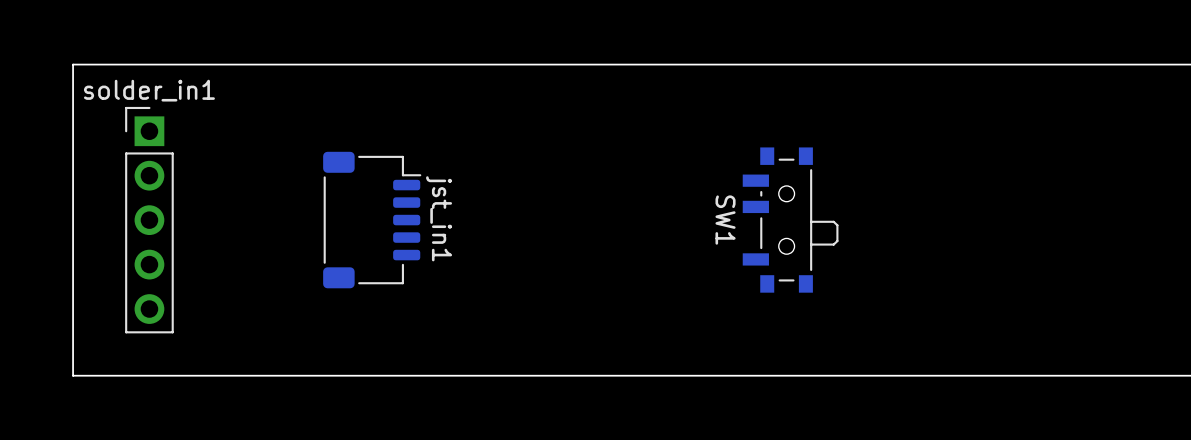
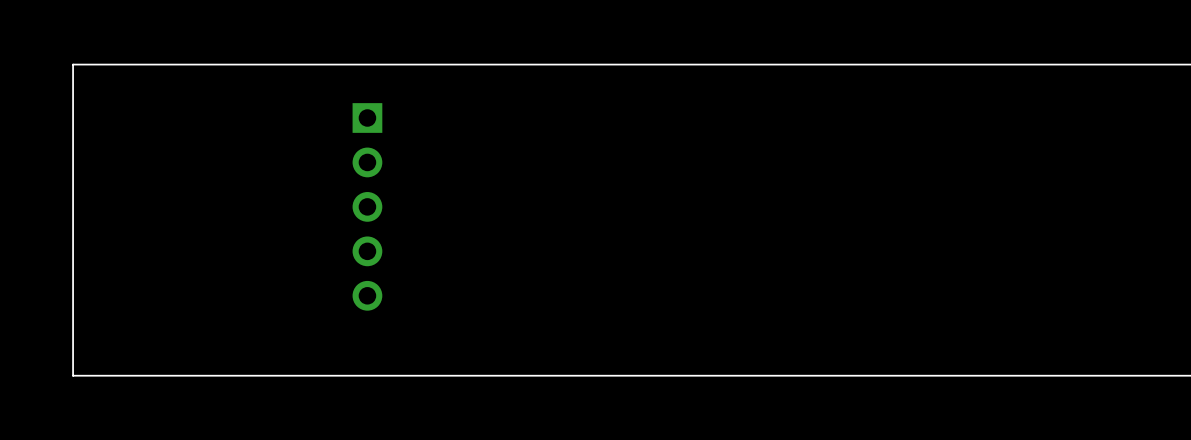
solder_in1 side: bottom (149, 220) -> top (367, 206)
jst_in1: (372, 220) -> none
SW1: (790, 220) -> none

